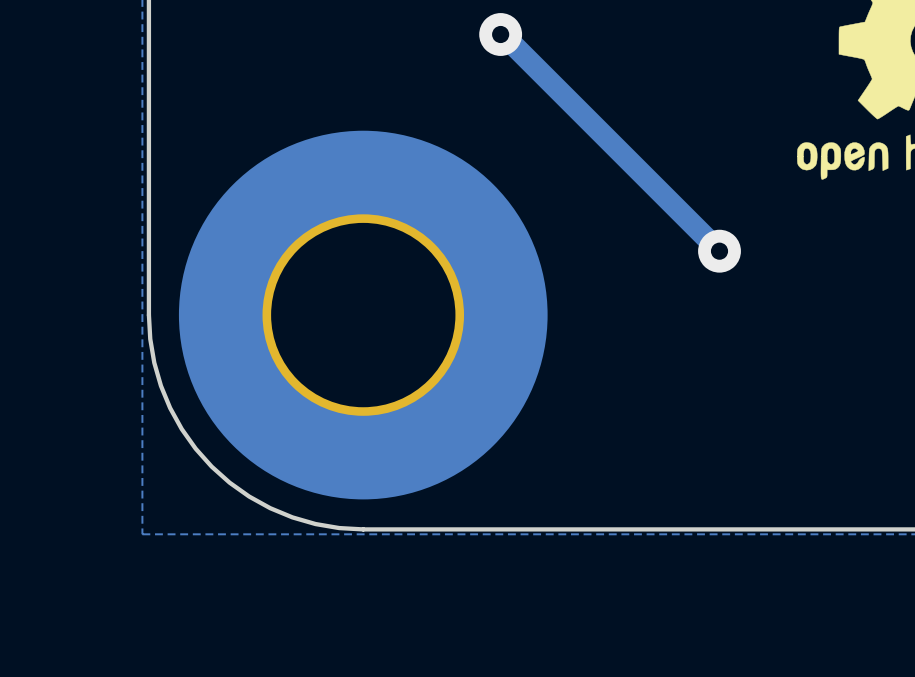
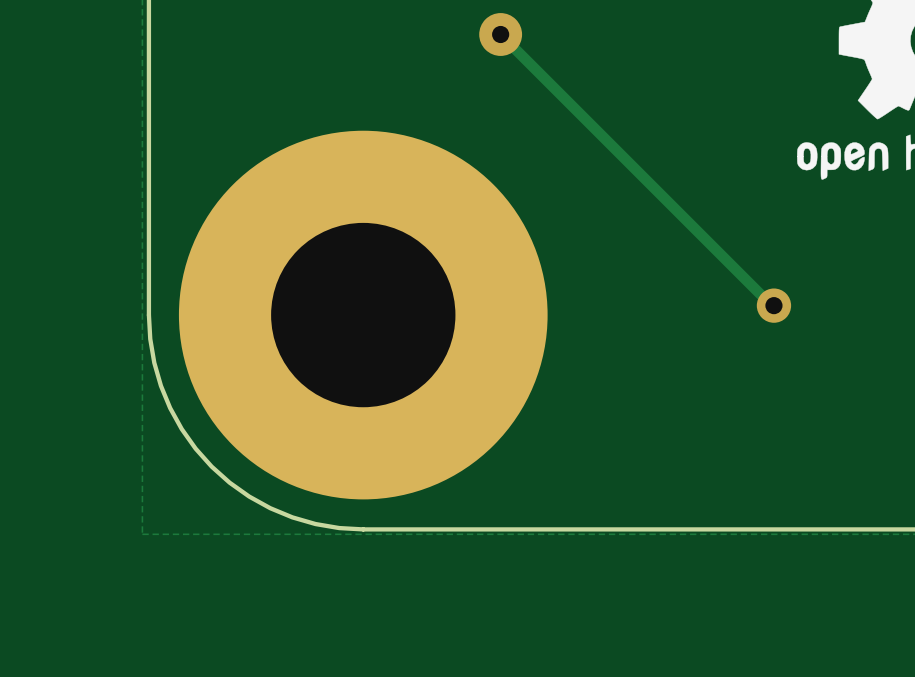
track: (500, 34) (502, 34) (719, 251) -> (500, 34) (771, 305) (773, 305)
via: (719, 251) -> none
via: none -> (773, 305)

